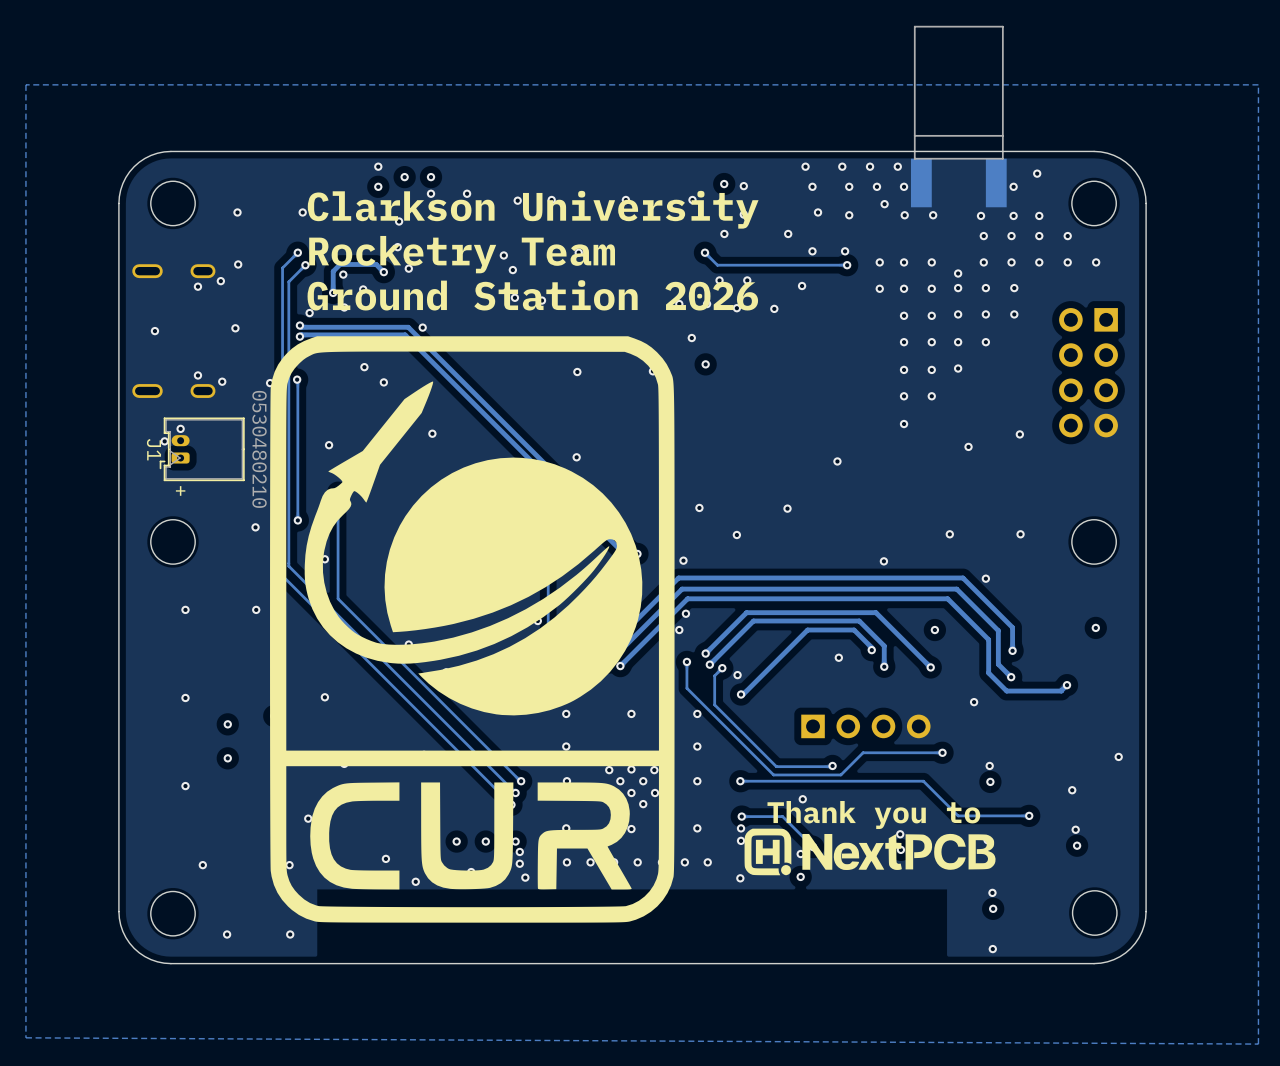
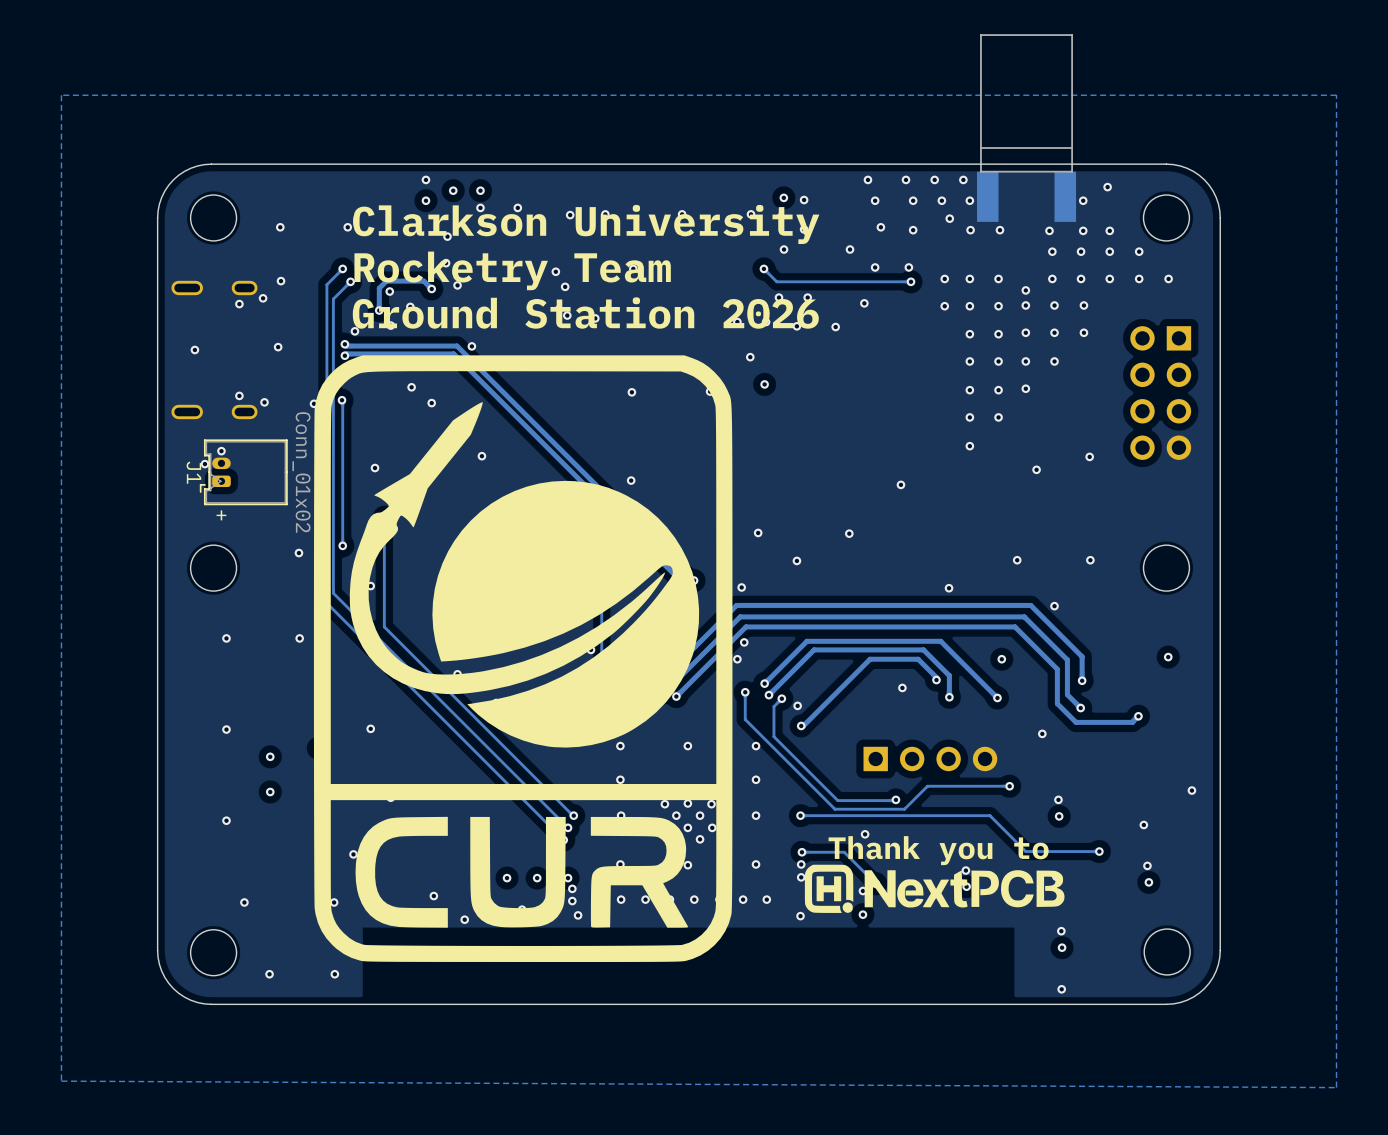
J1 value: 0530480210 (259, 449) -> Conn_01x02 (301, 472)

